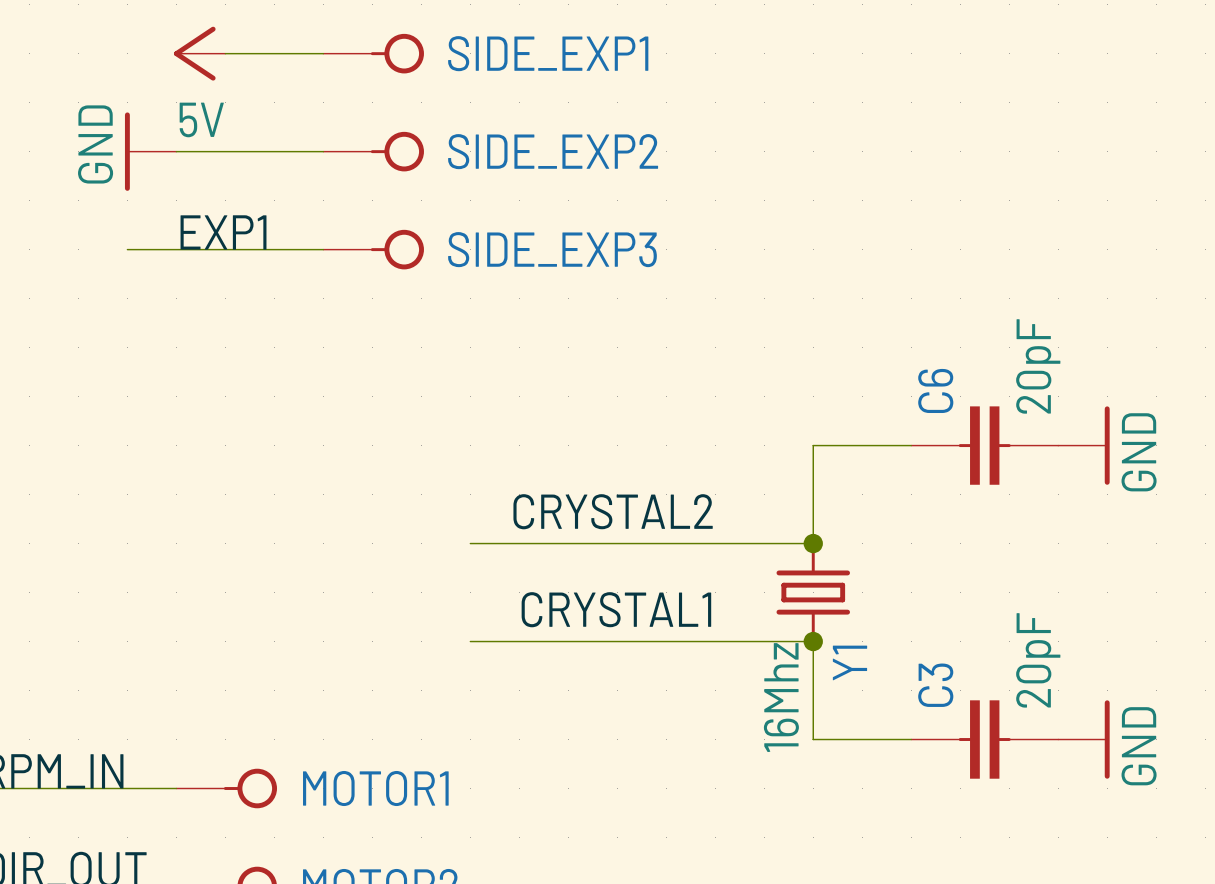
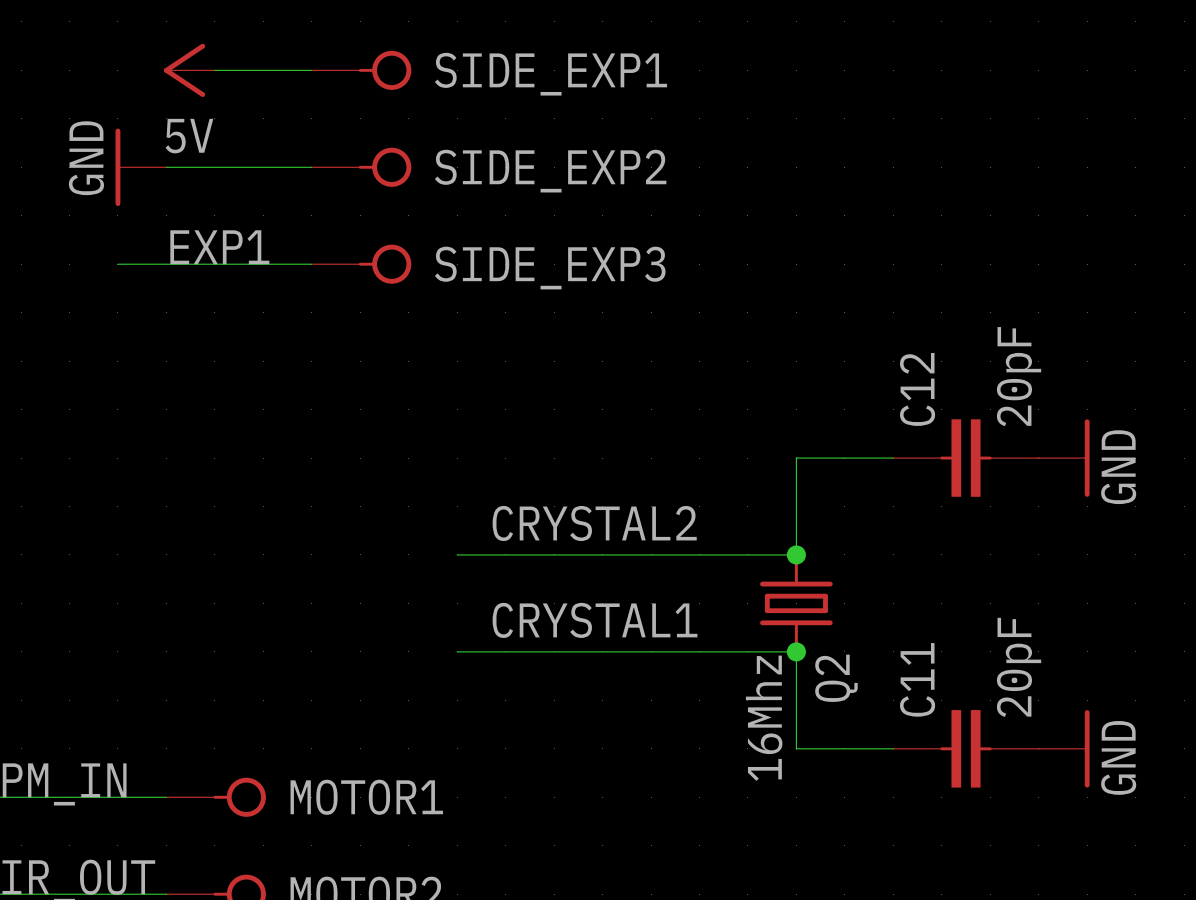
C6 name: C6 (935, 390) -> C12 (917, 389)
Y1 name: Y1 (850, 662) -> Q2 (836, 678)
C3 name: C3 (935, 685) -> C11 (917, 679)

